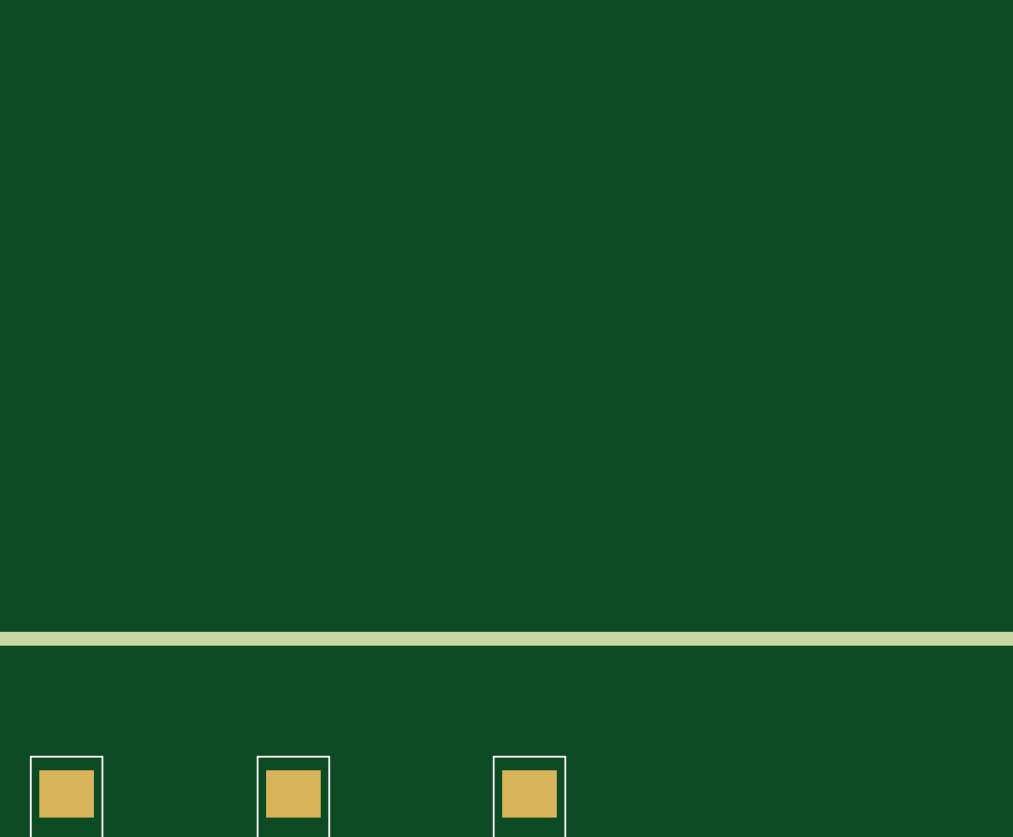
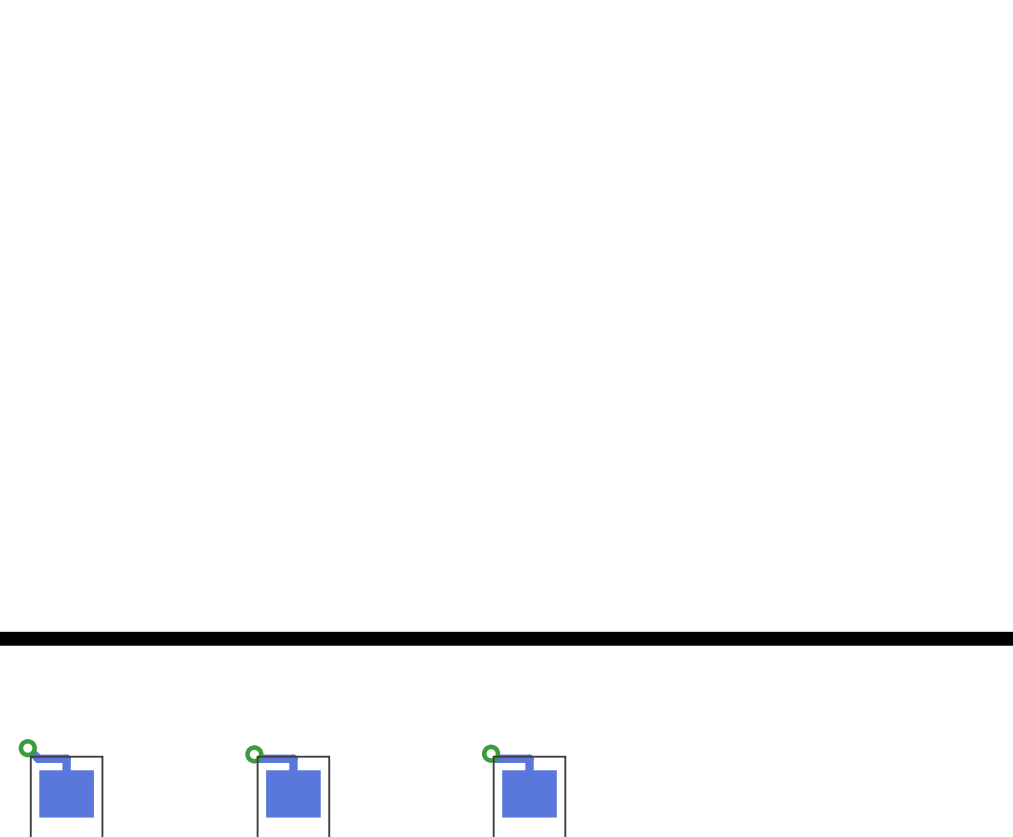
track: none -> (27, 748) (38, 758) (66, 758) (66, 793)
via: none -> (27, 748)
track: none -> (491, 753) (496, 758) (529, 758) (529, 793)
via: none -> (491, 753)
track: none -> (254, 754) (258, 758) (293, 758) (293, 793)
via: none -> (254, 754)

